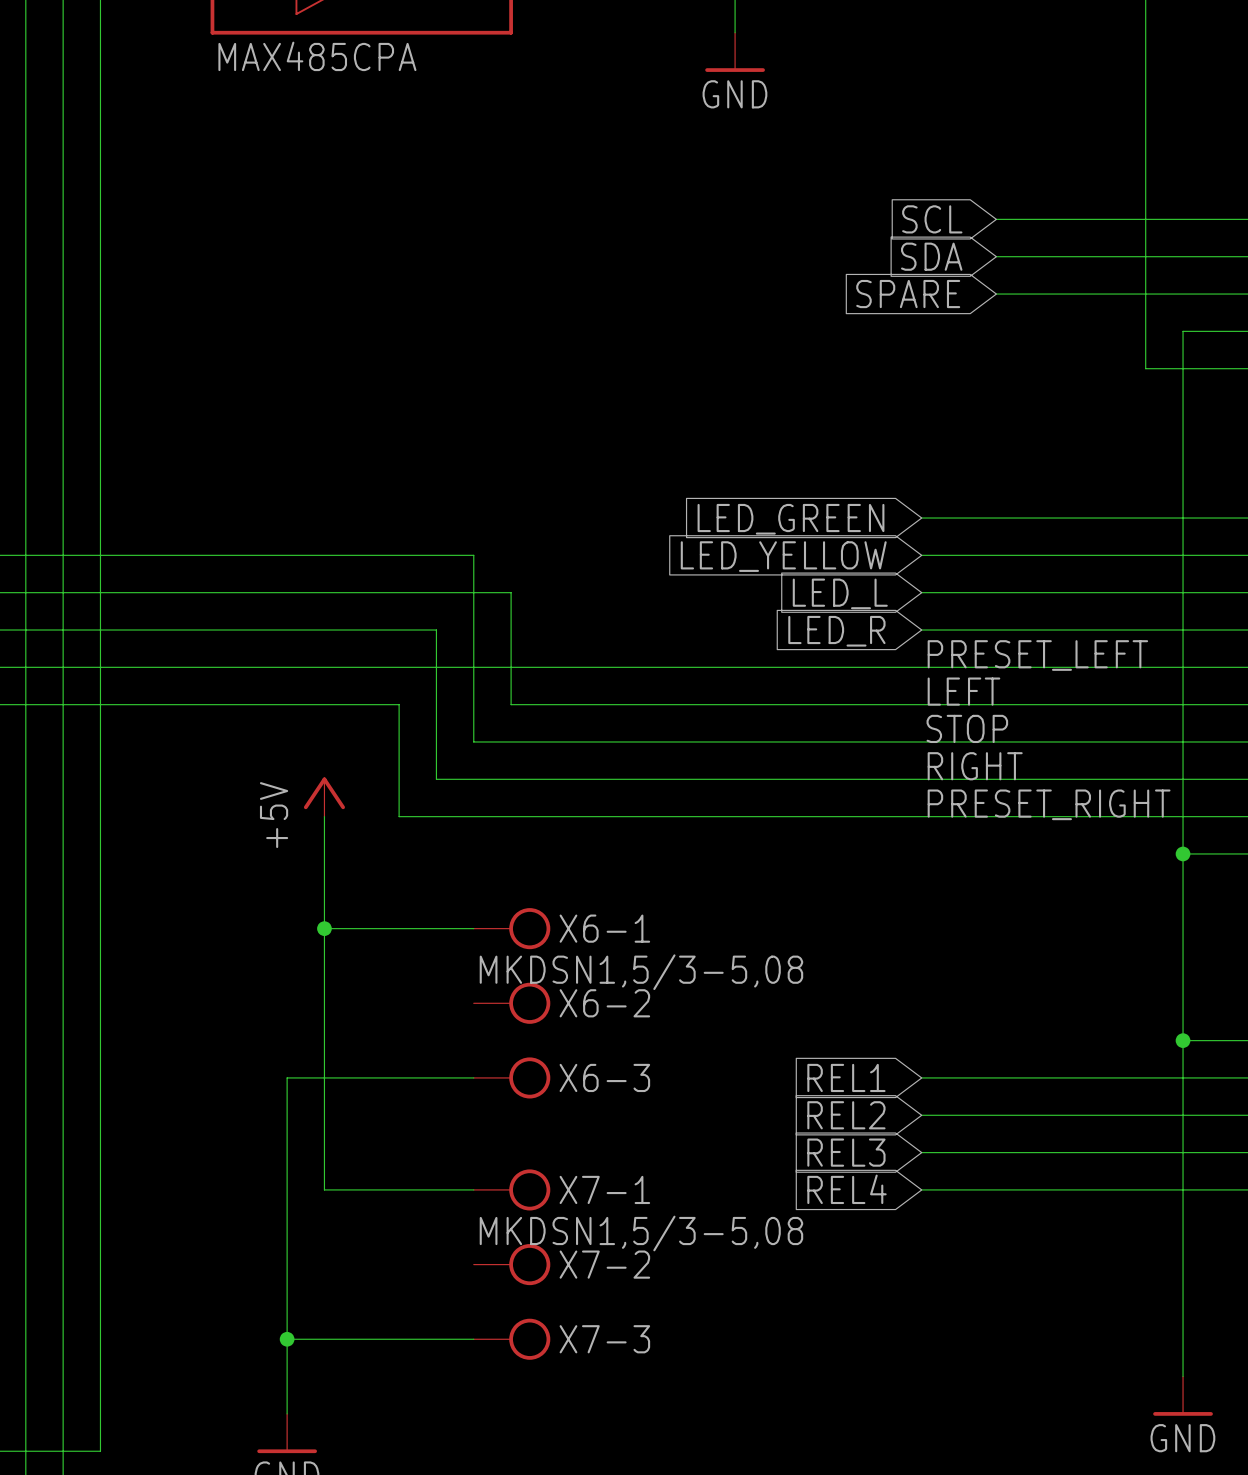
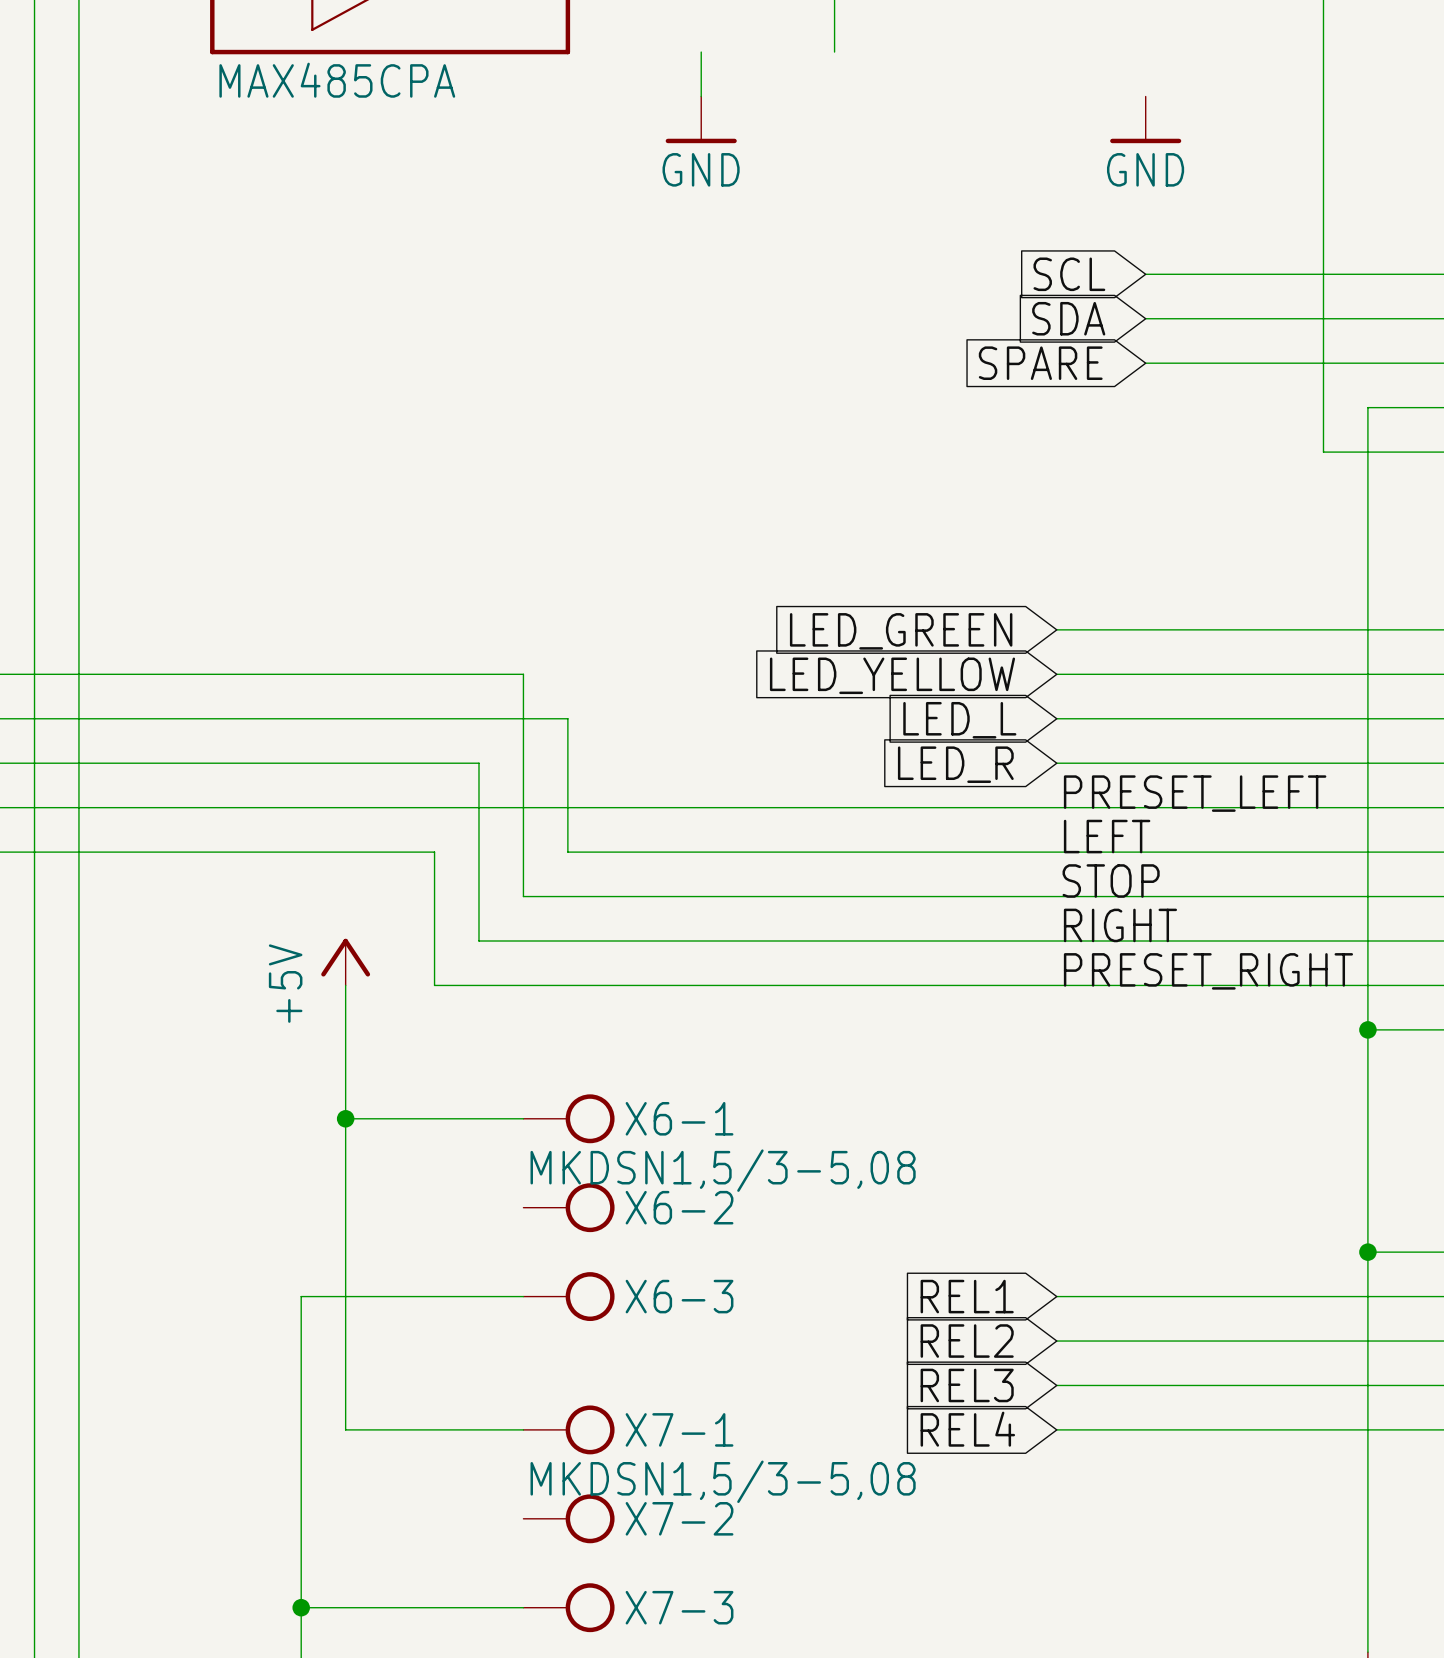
wire: none -> (701, 52) (701, 96)
power symbol position: GND (735, 52) -> GND (701, 119)
power symbol: none -> GND (1145, 119)

